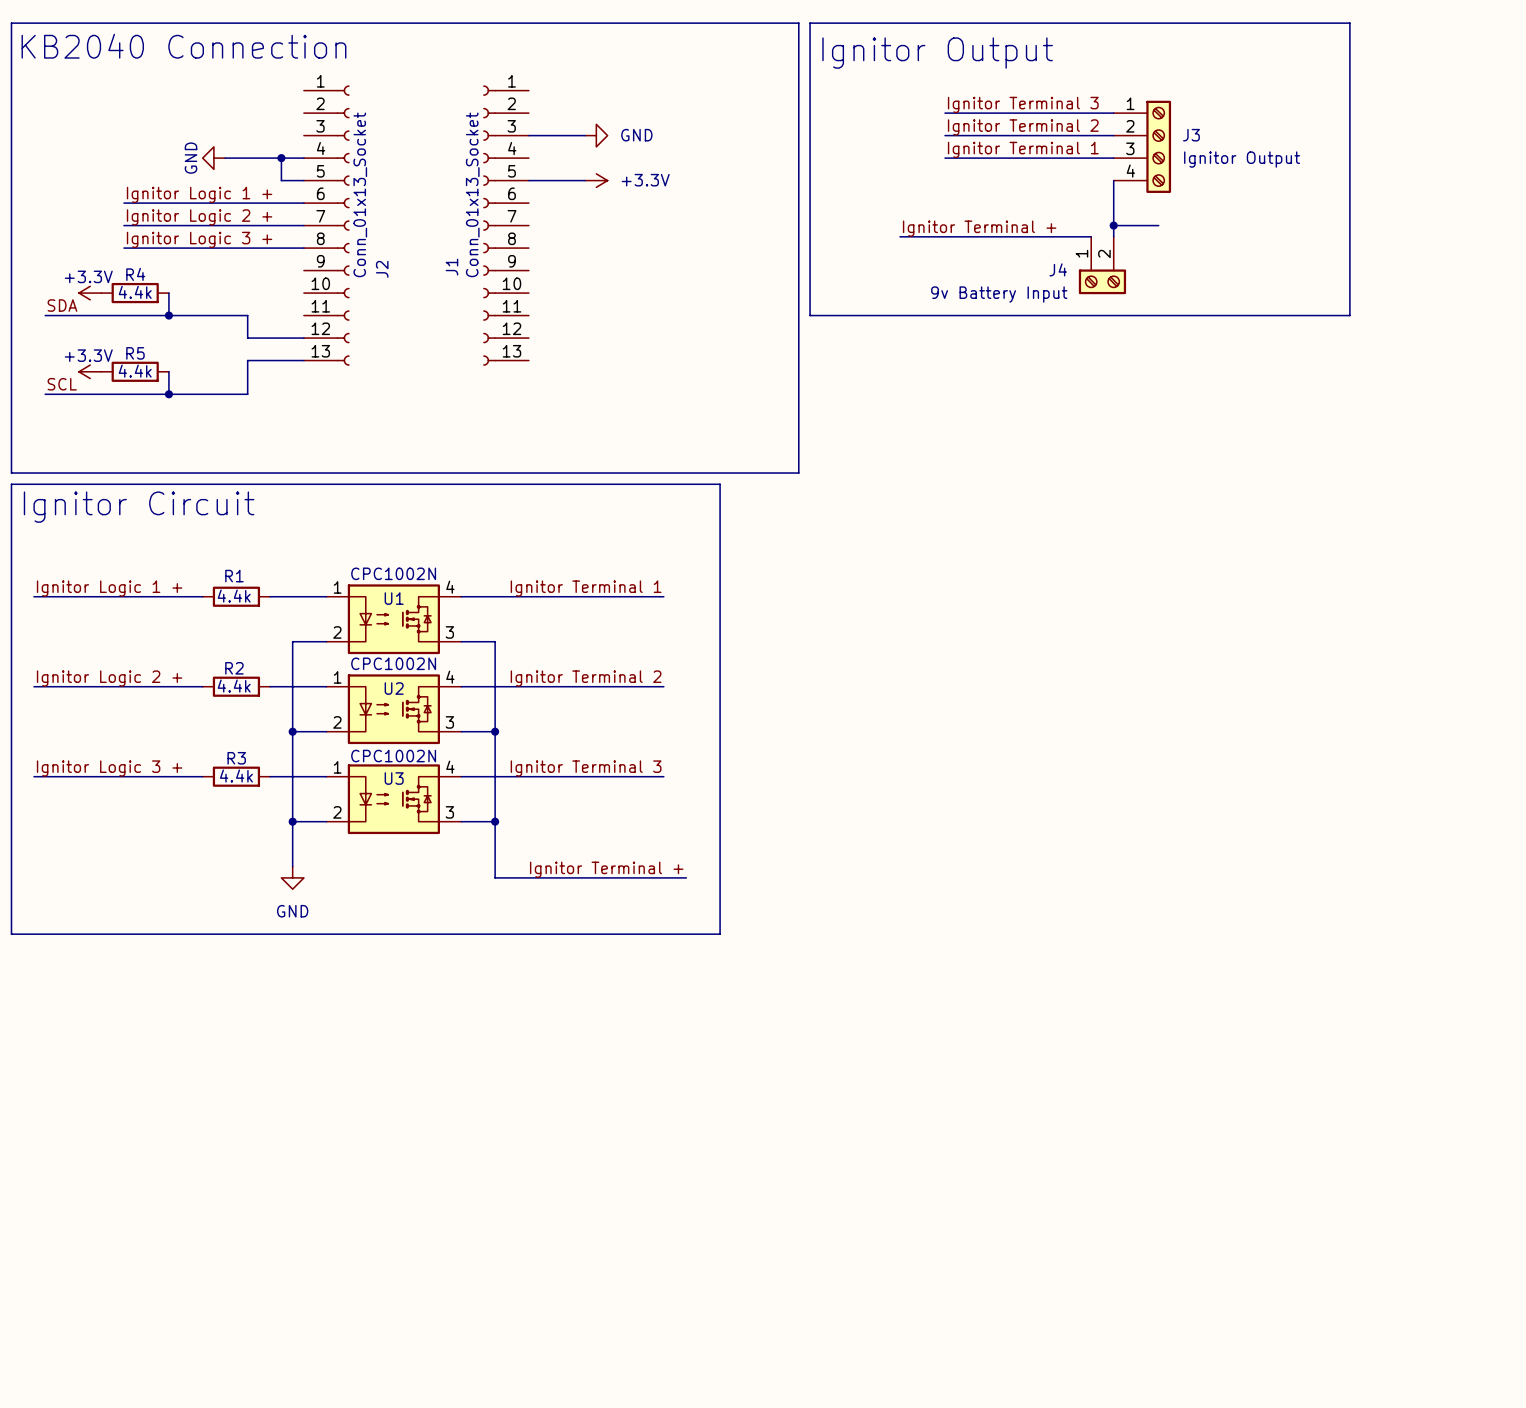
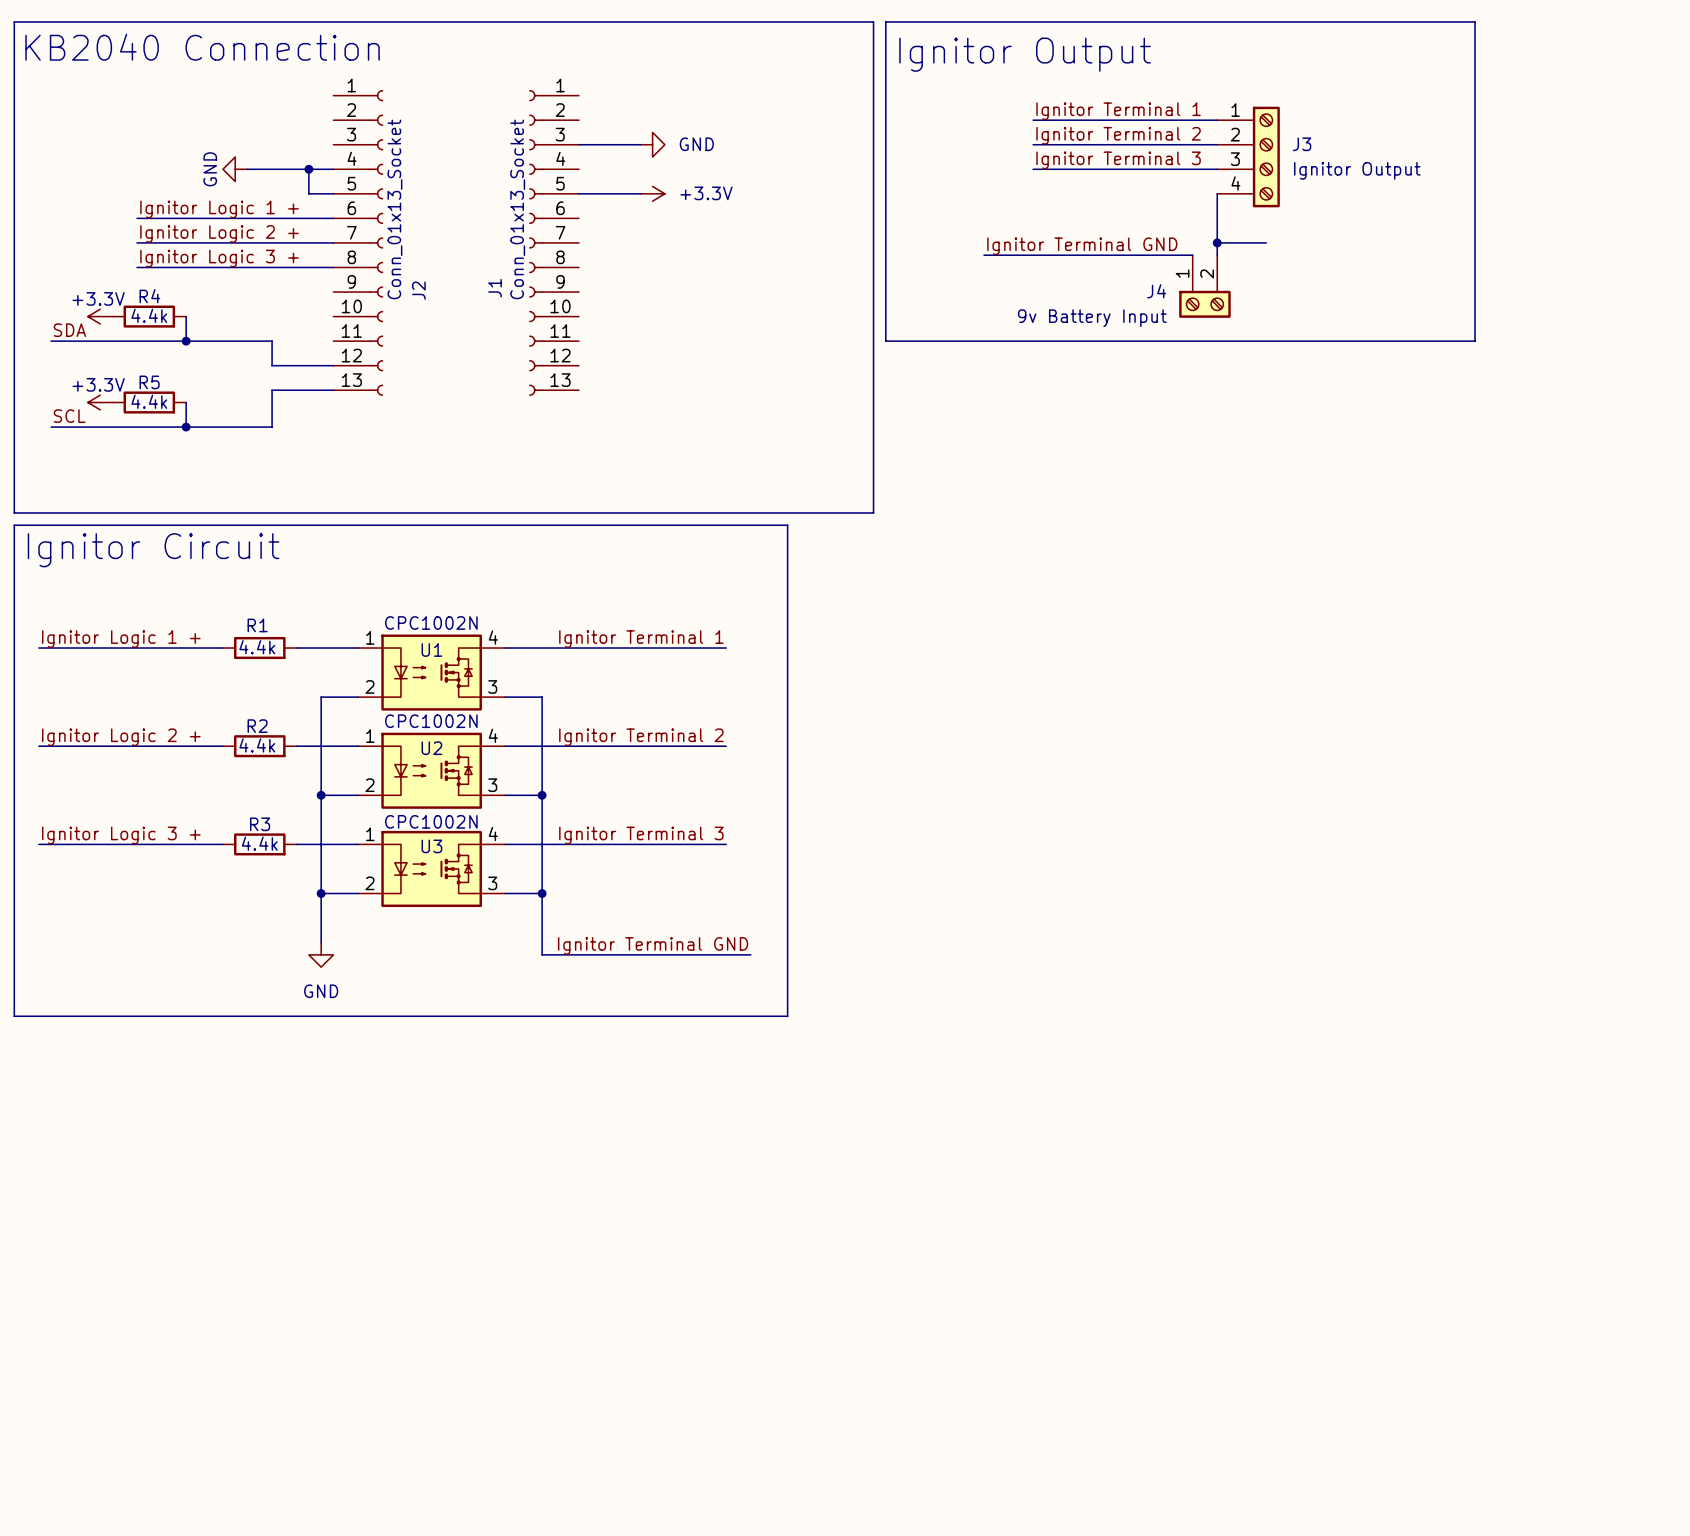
label: Ignitor Terminal 3 (1023, 104) -> Ignitor Terminal 1 (1118, 111)
label: Ignitor Terminal 1 (1023, 149) -> Ignitor Terminal 3 (1118, 160)
label: Ignitor Terminal + (979, 228) -> Ignitor Terminal GND (1082, 246)
label: Ignitor Terminal + (606, 869) -> Ignitor Terminal GND (653, 945)

